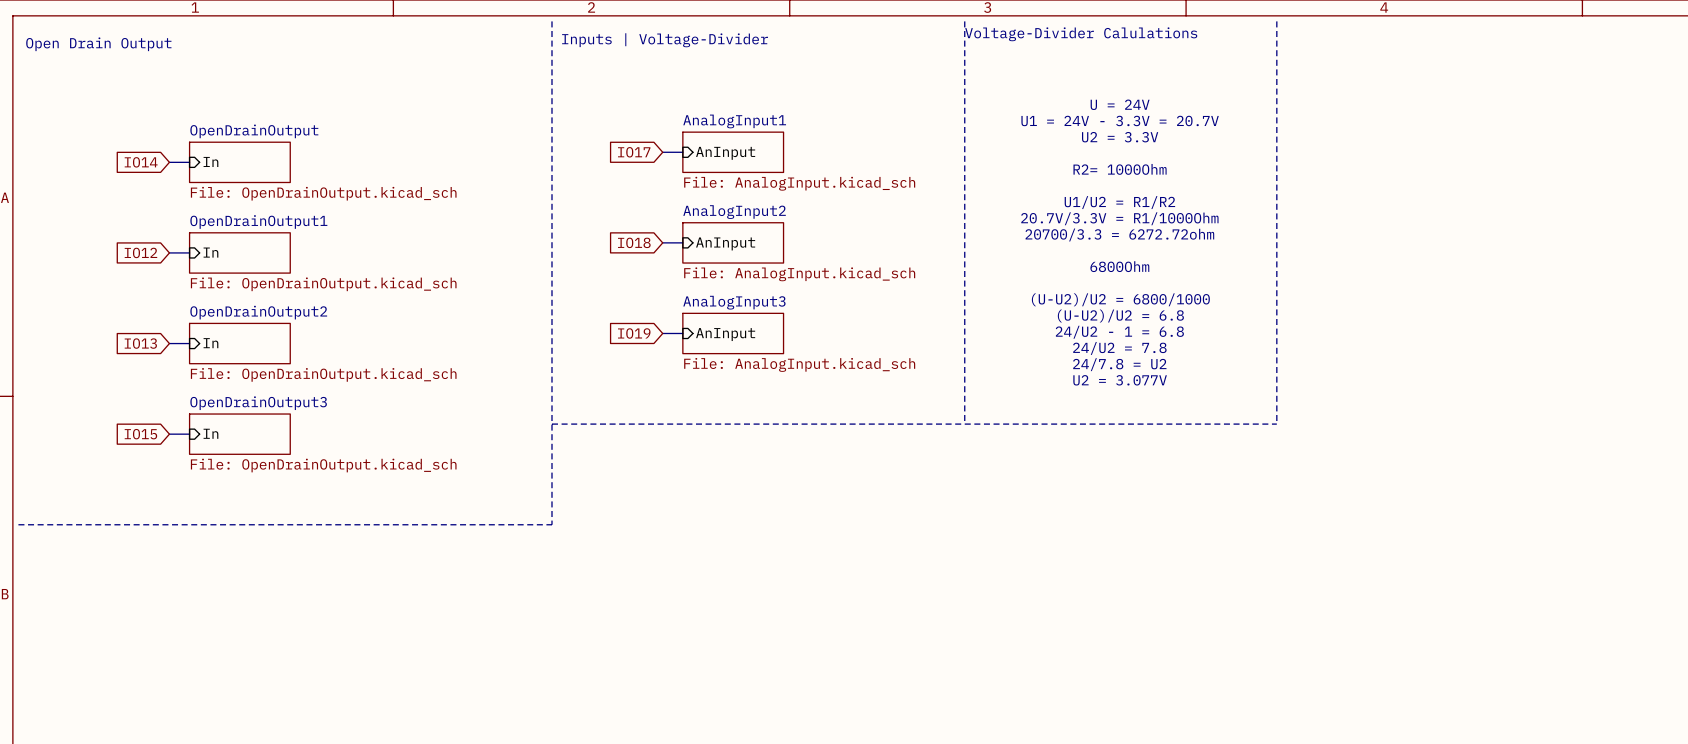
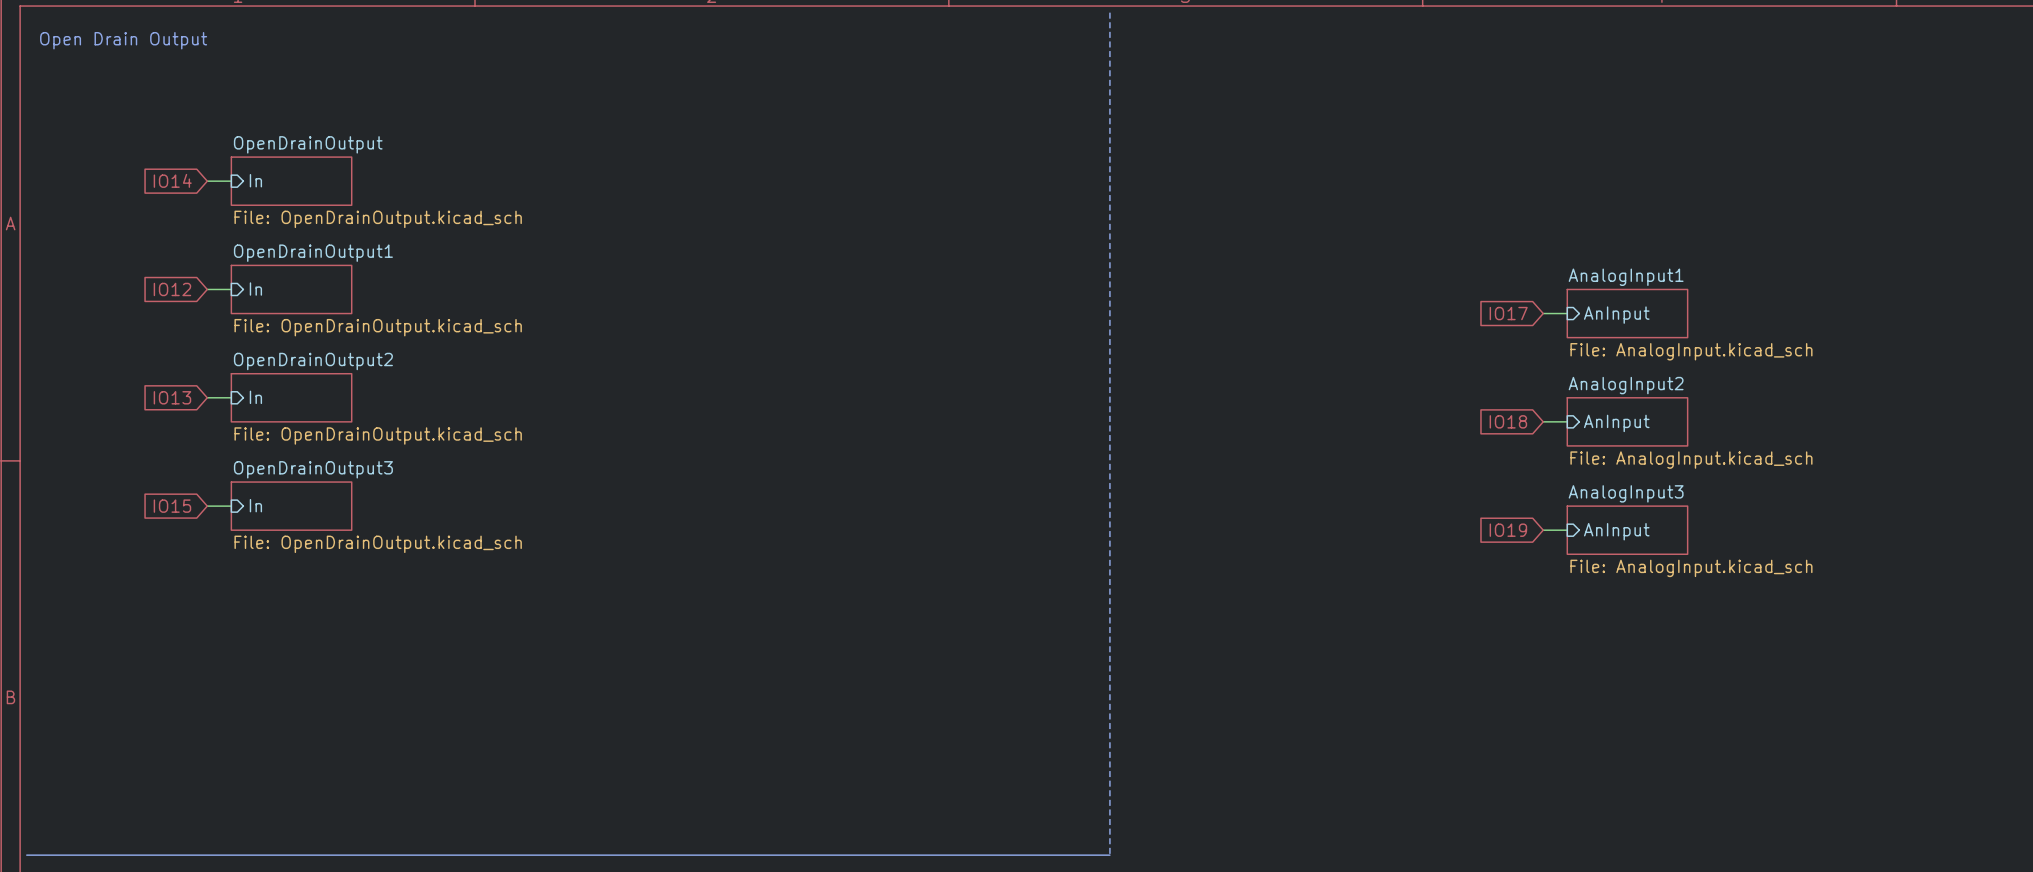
line: (551, 21) (551, 524) (18, 524) -> none
line: none -> (1109, 12) (1109, 855) (26, 855)
line: (964, 21) (964, 424) -> none
line: (1276, 21) (1276, 424) (551, 424) -> none
text: Voltage-Divider Calulations (1081, 34) -> none
text: Inputs | Voltage-Divider (665, 40) -> none
text: U = 24V (1120, 104) -> none
text: U1 = 24V - 3.3V = 20.7V (1120, 120) -> none
text: U2 = 3.3V (1120, 137) -> none
global label: IO17 (634, 152) -> none
wire: (662, 152) (682, 152) -> none
sheet AnalogInput1 position: (733, 152) -> (1627, 313)
sheet pin: AnInput (725, 153) -> none
text: R2= 1000Ohm (1120, 169) -> none
text: U1/U2 = R1/R2 (1119, 202) -> none
text: 20.7V/3.3V = R1/1000Ohm (1119, 218) -> none
text: 20700/3.3 = 6272.72ohm (1119, 234) -> none
global label: IO18 (634, 242) -> none
wire: (662, 242) (682, 242) -> none
sheet AnalogInput2 position: (733, 242) -> (1627, 421)
sheet pin: AnInput (725, 243) -> none
text: 6800Ohm (1119, 266) -> none
global label: none -> IO17 (1508, 313)
wire: none -> (1543, 313) (1567, 313)
sheet pin: none -> AnInput (1616, 315)
text: (U-U2)/U2 = 6800/1000 (1120, 299) -> none
text: (U-U2)/U2 = 6.8 (1120, 316) -> none
text: 24/U2 - 1 = 6.8 (1119, 332) -> none
global label: IO19 (634, 333) -> none
wire: (662, 333) (682, 333) -> none
sheet AnalogInput3 position: (733, 333) -> (1627, 530)
sheet pin: AnInput (725, 334) -> none
text: 24/U2 = 7.8 (1119, 348) -> none
global label: none -> IO18 (1508, 421)
wire: none -> (1543, 421) (1567, 421)
text: 24/7.8 = U2 (1119, 364) -> none
sheet pin: none -> AnInput (1616, 423)
text: U2 = 3.077V (1120, 380) -> none
global label: none -> IO19 (1508, 530)
wire: none -> (1543, 530) (1567, 530)
sheet pin: none -> AnInput (1616, 531)

